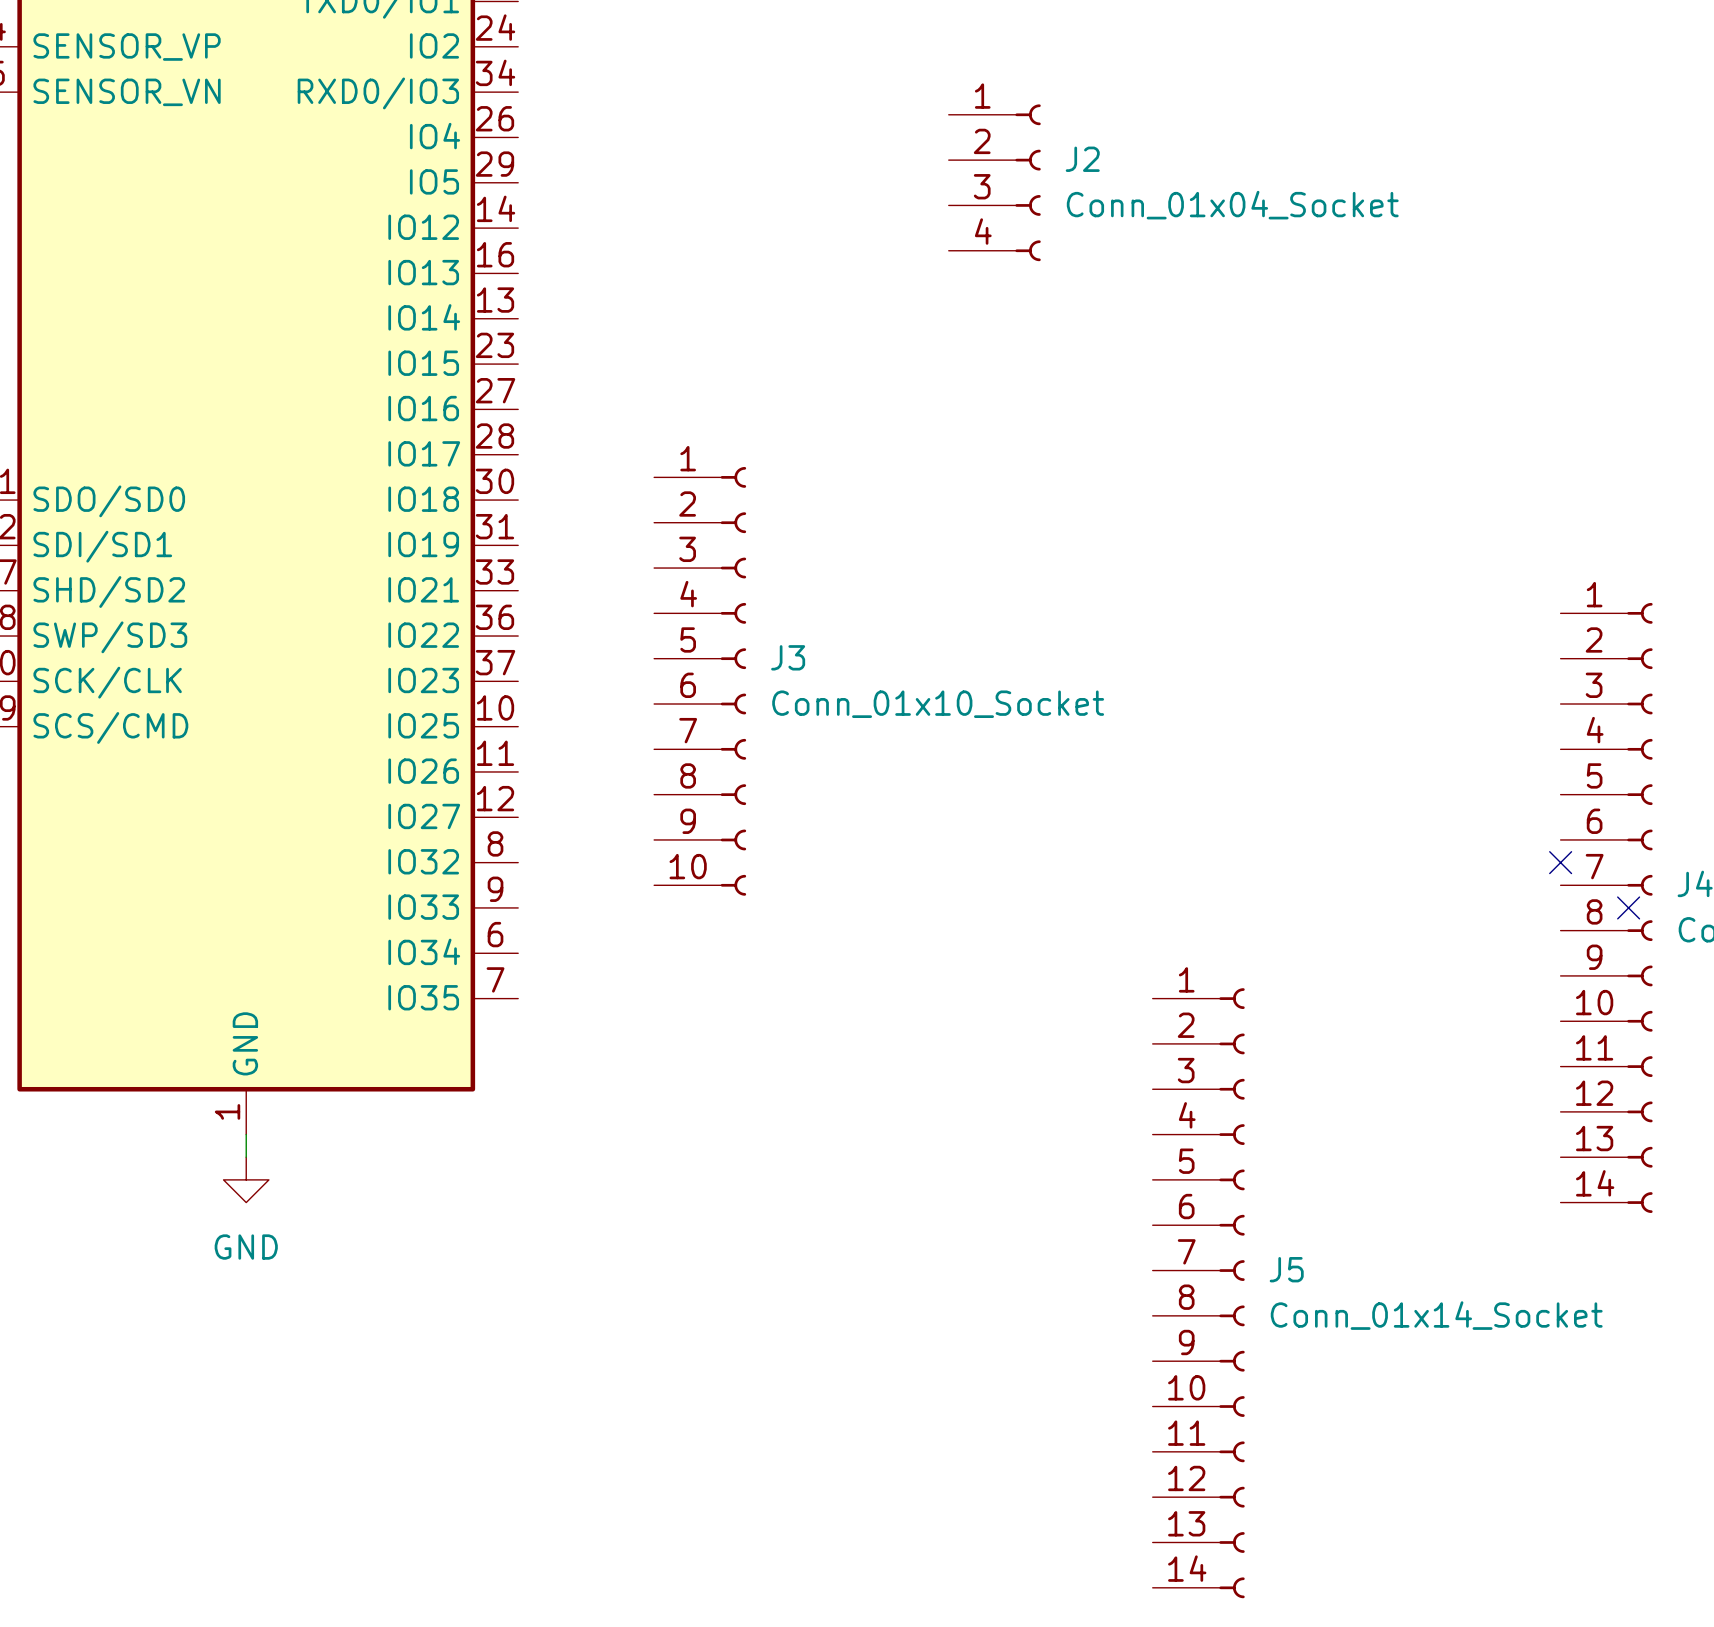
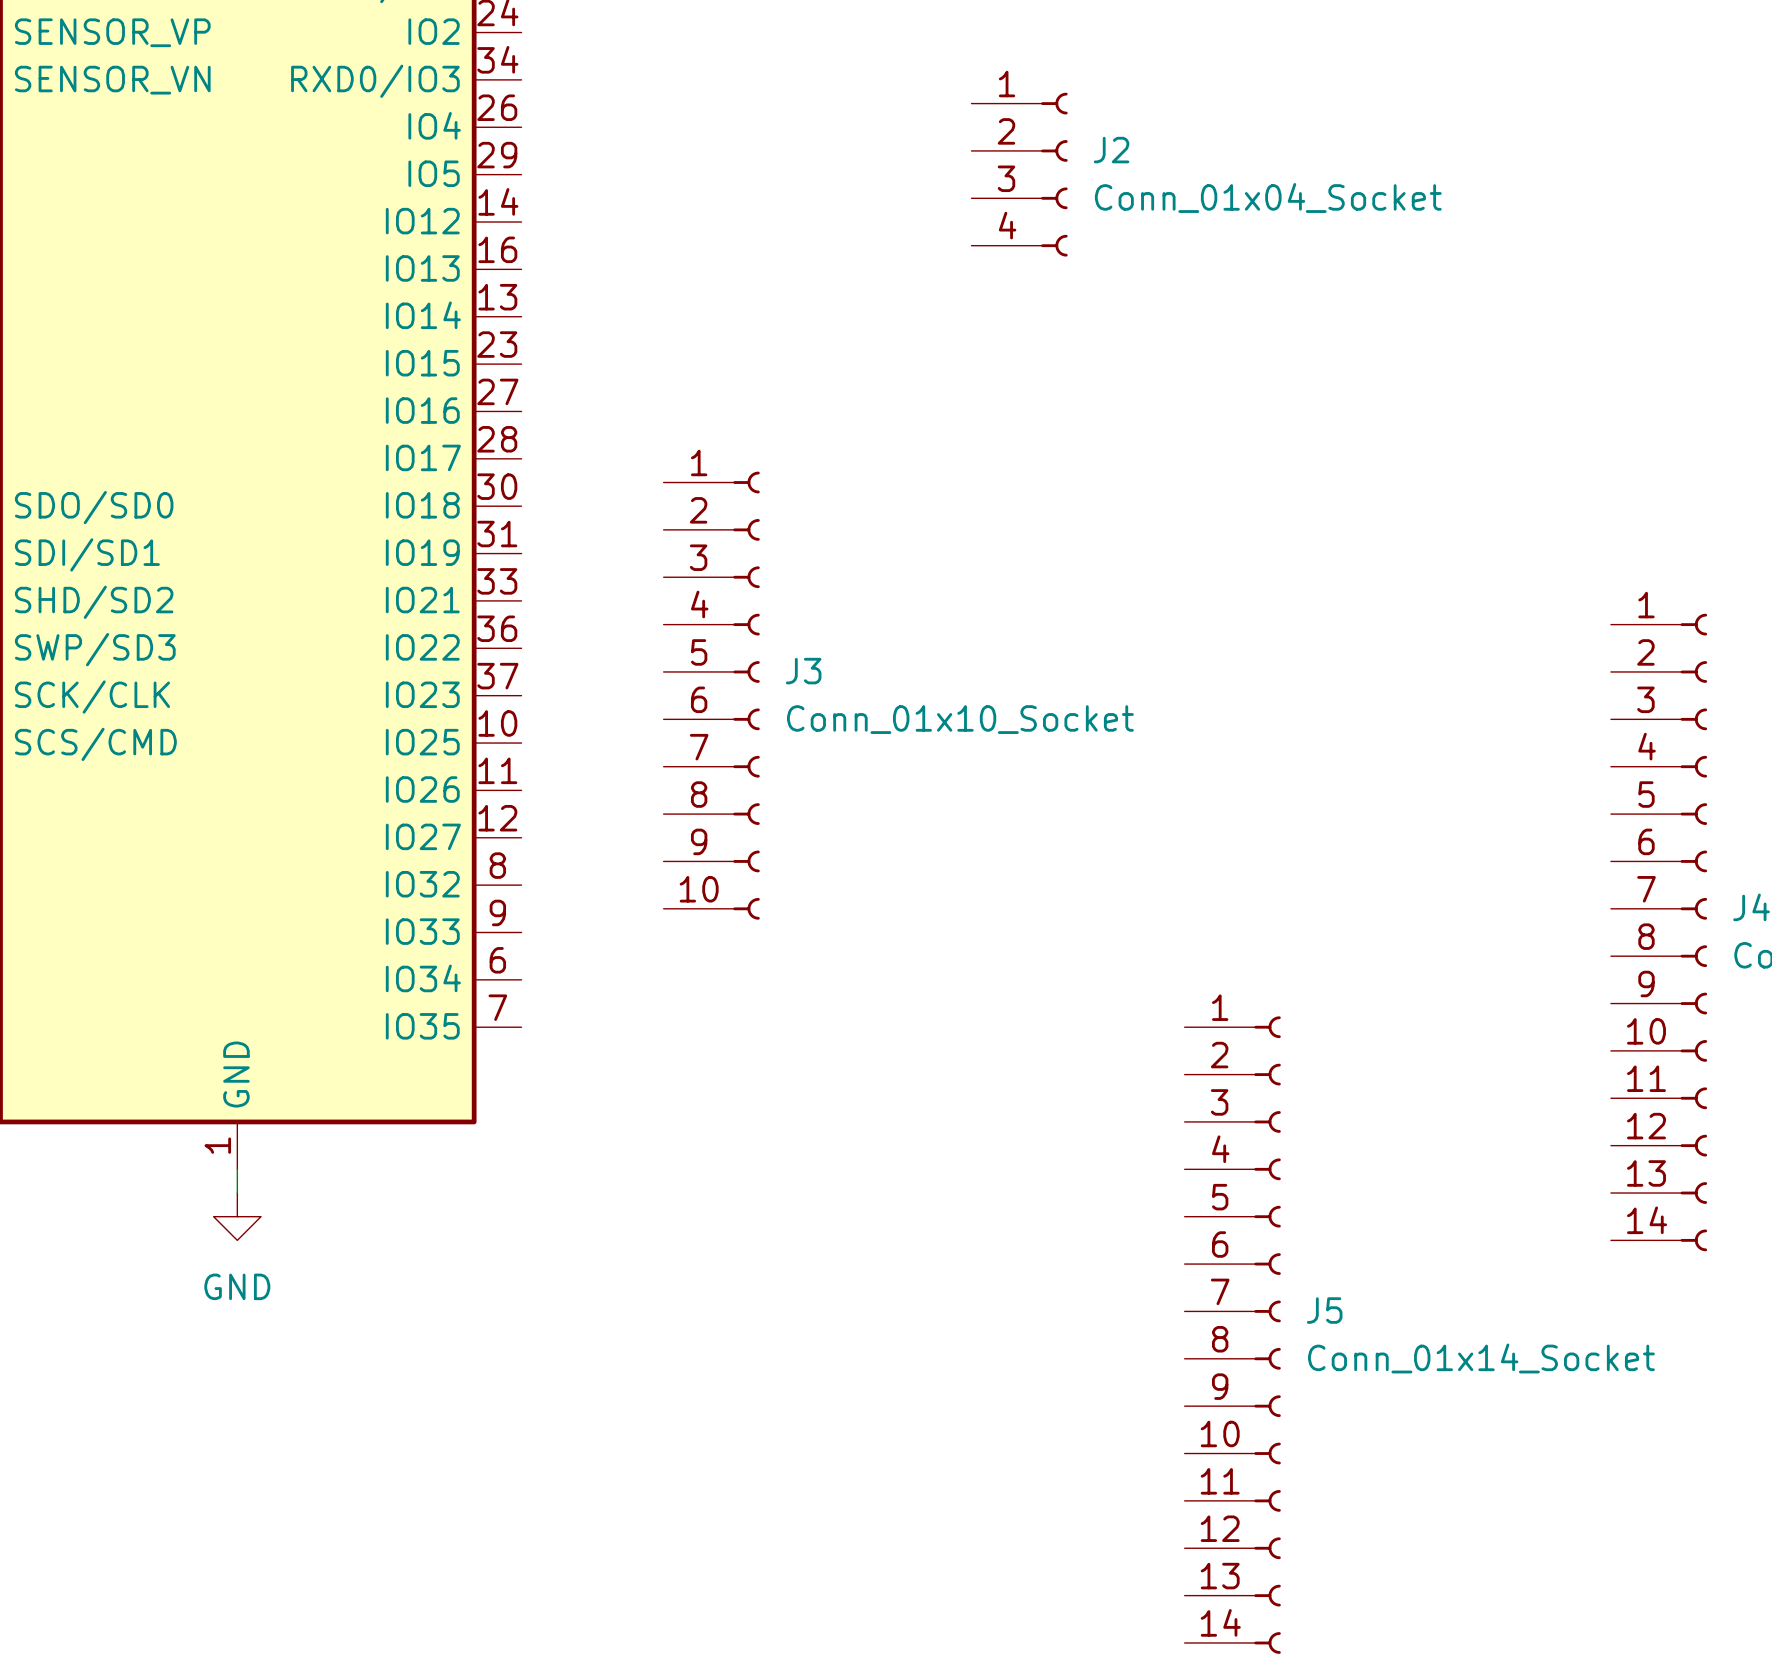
no-connect mark: (1560, 862) -> none
no-connect mark: (1628, 907) -> none

